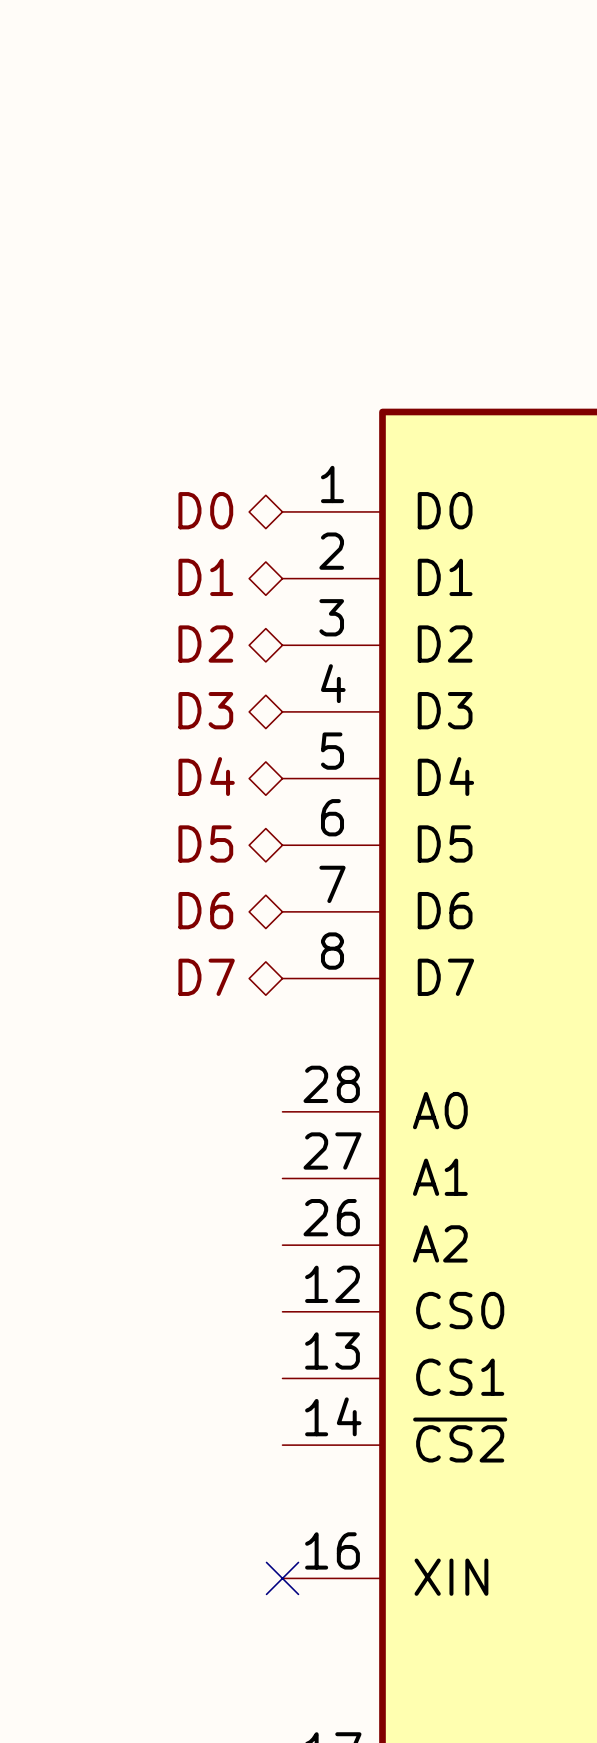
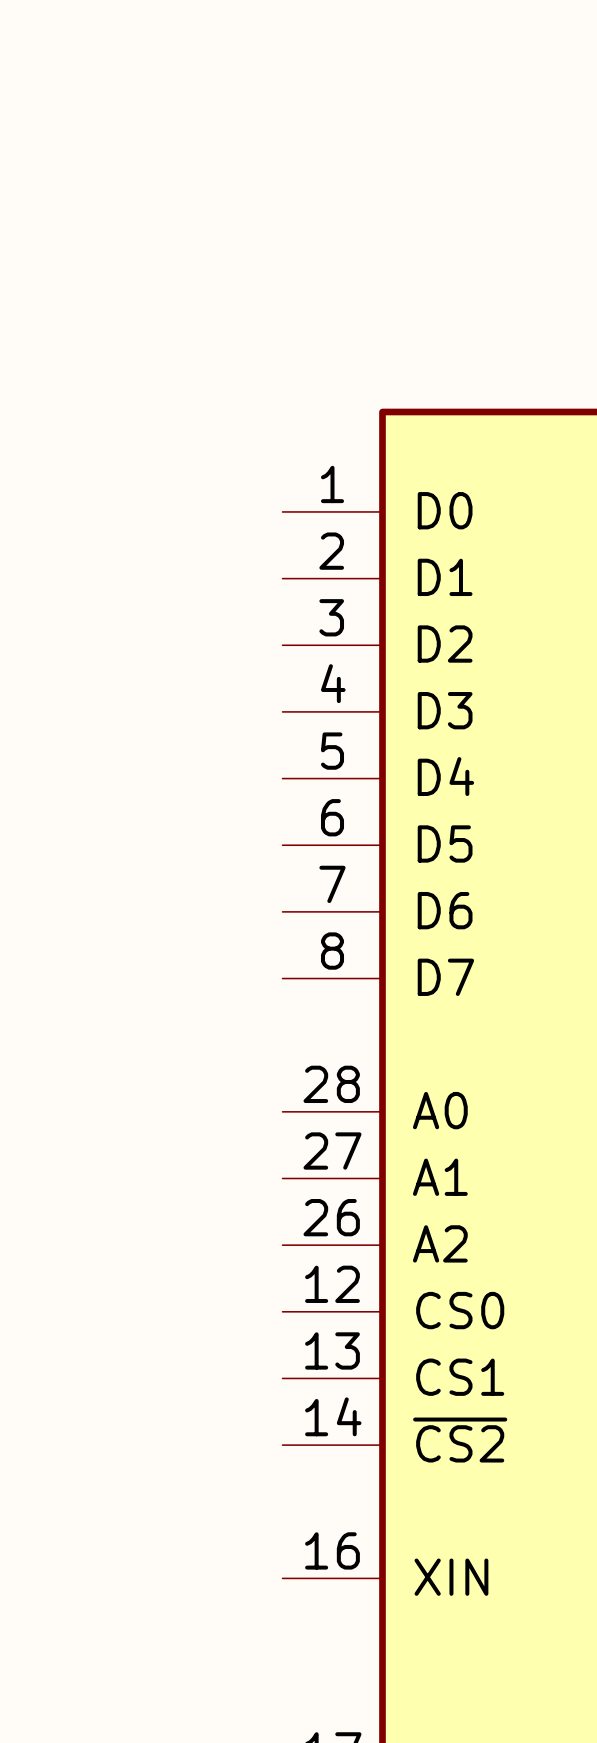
hierarchical label: D0 (205, 510) -> none
hierarchical label: D1 (205, 577) -> none
hierarchical label: D2 (205, 644) -> none
hierarchical label: D3 (205, 710) -> none
hierarchical label: D4 (206, 776) -> none
hierarchical label: D5 (205, 843) -> none
hierarchical label: D6 (205, 910) -> none
hierarchical label: D7 (206, 977) -> none
no-connect mark: (282, 1578) -> none

